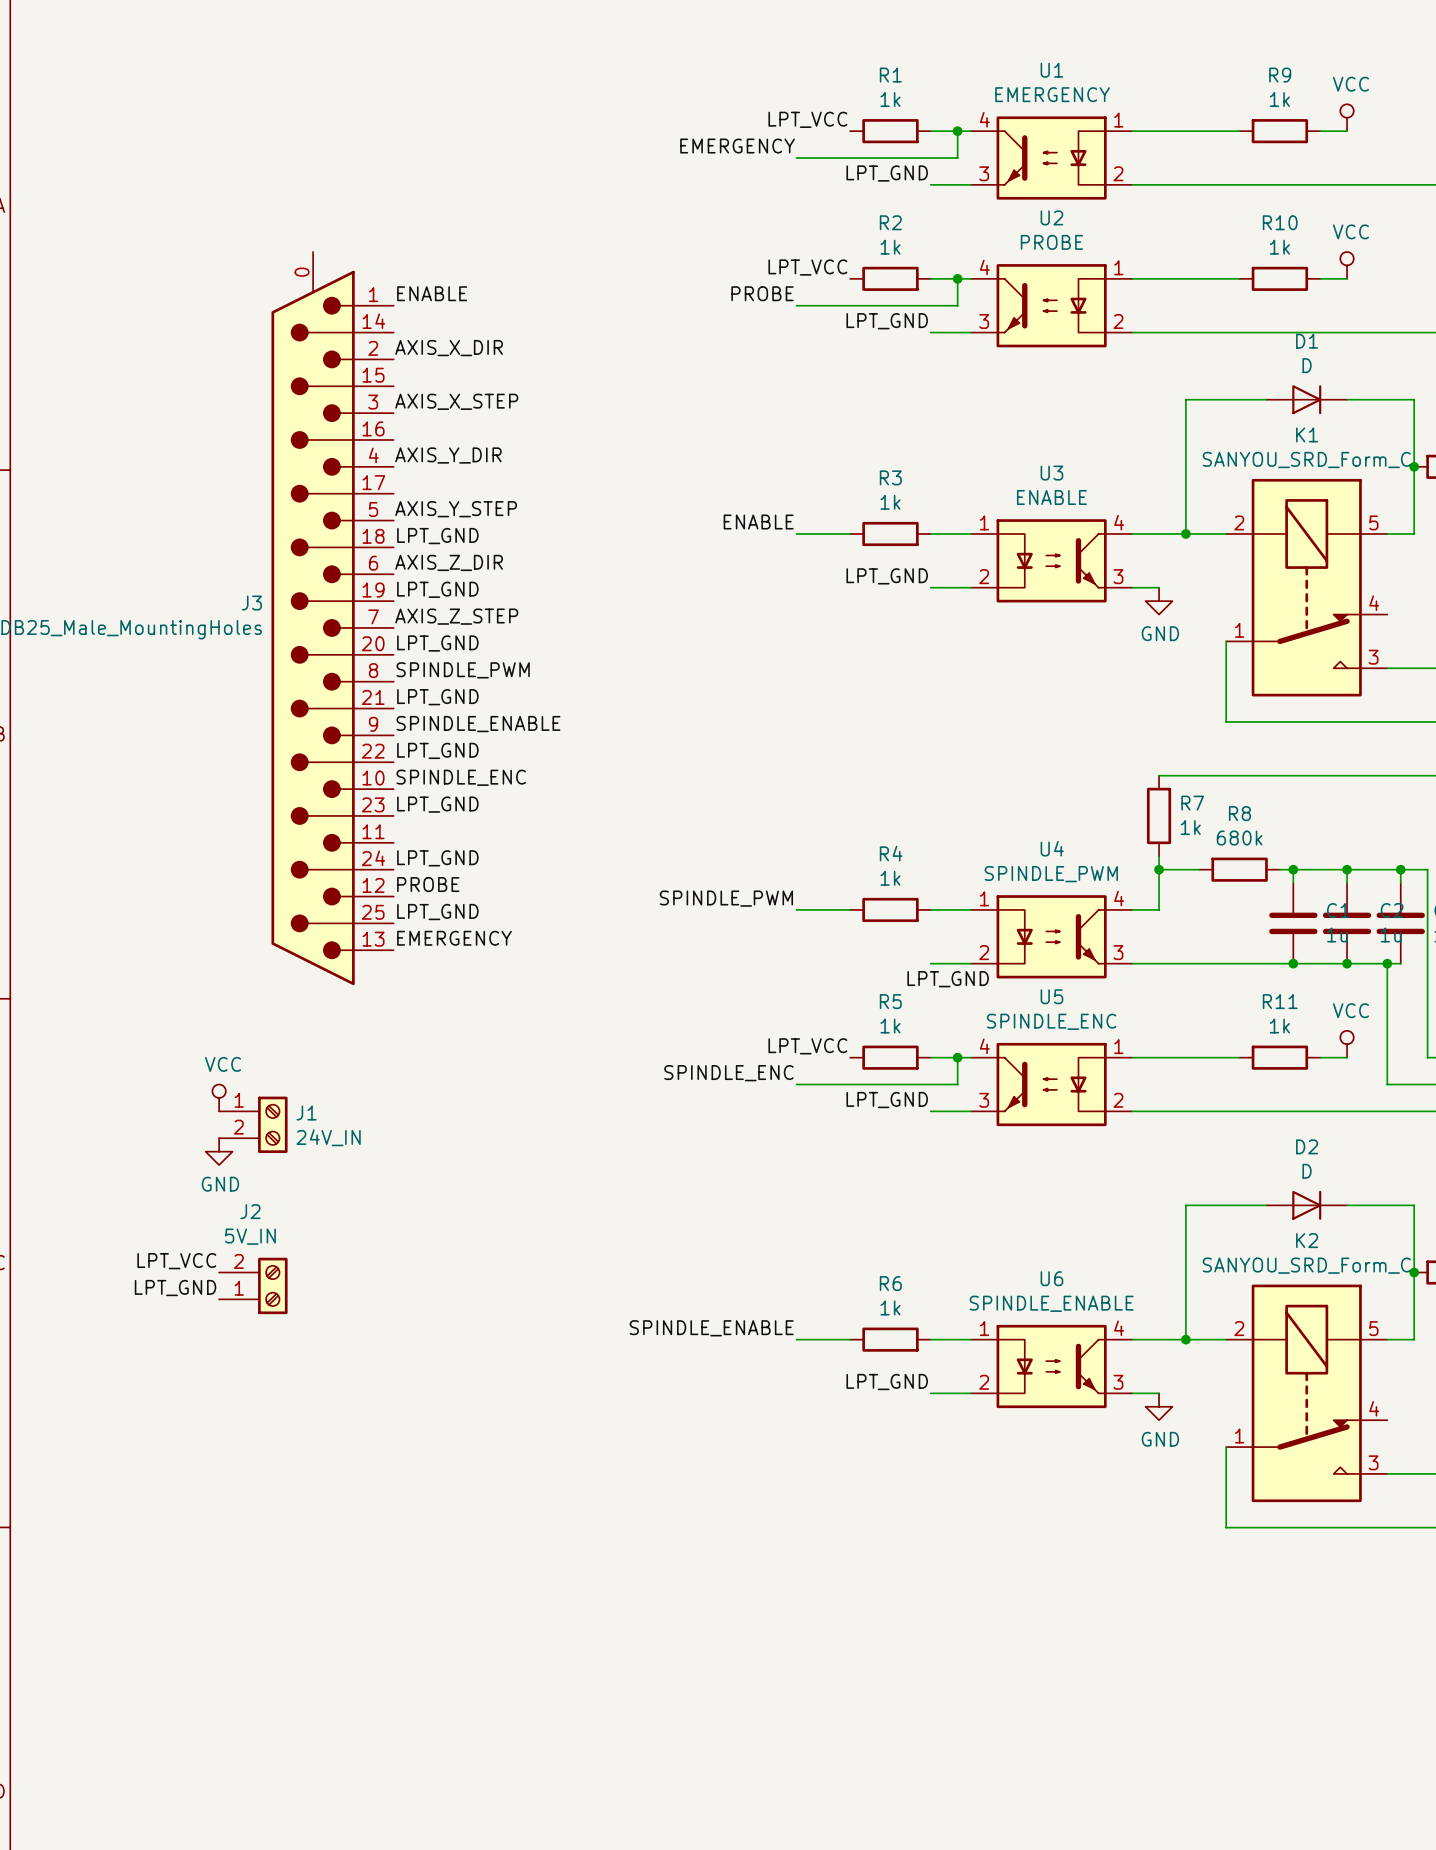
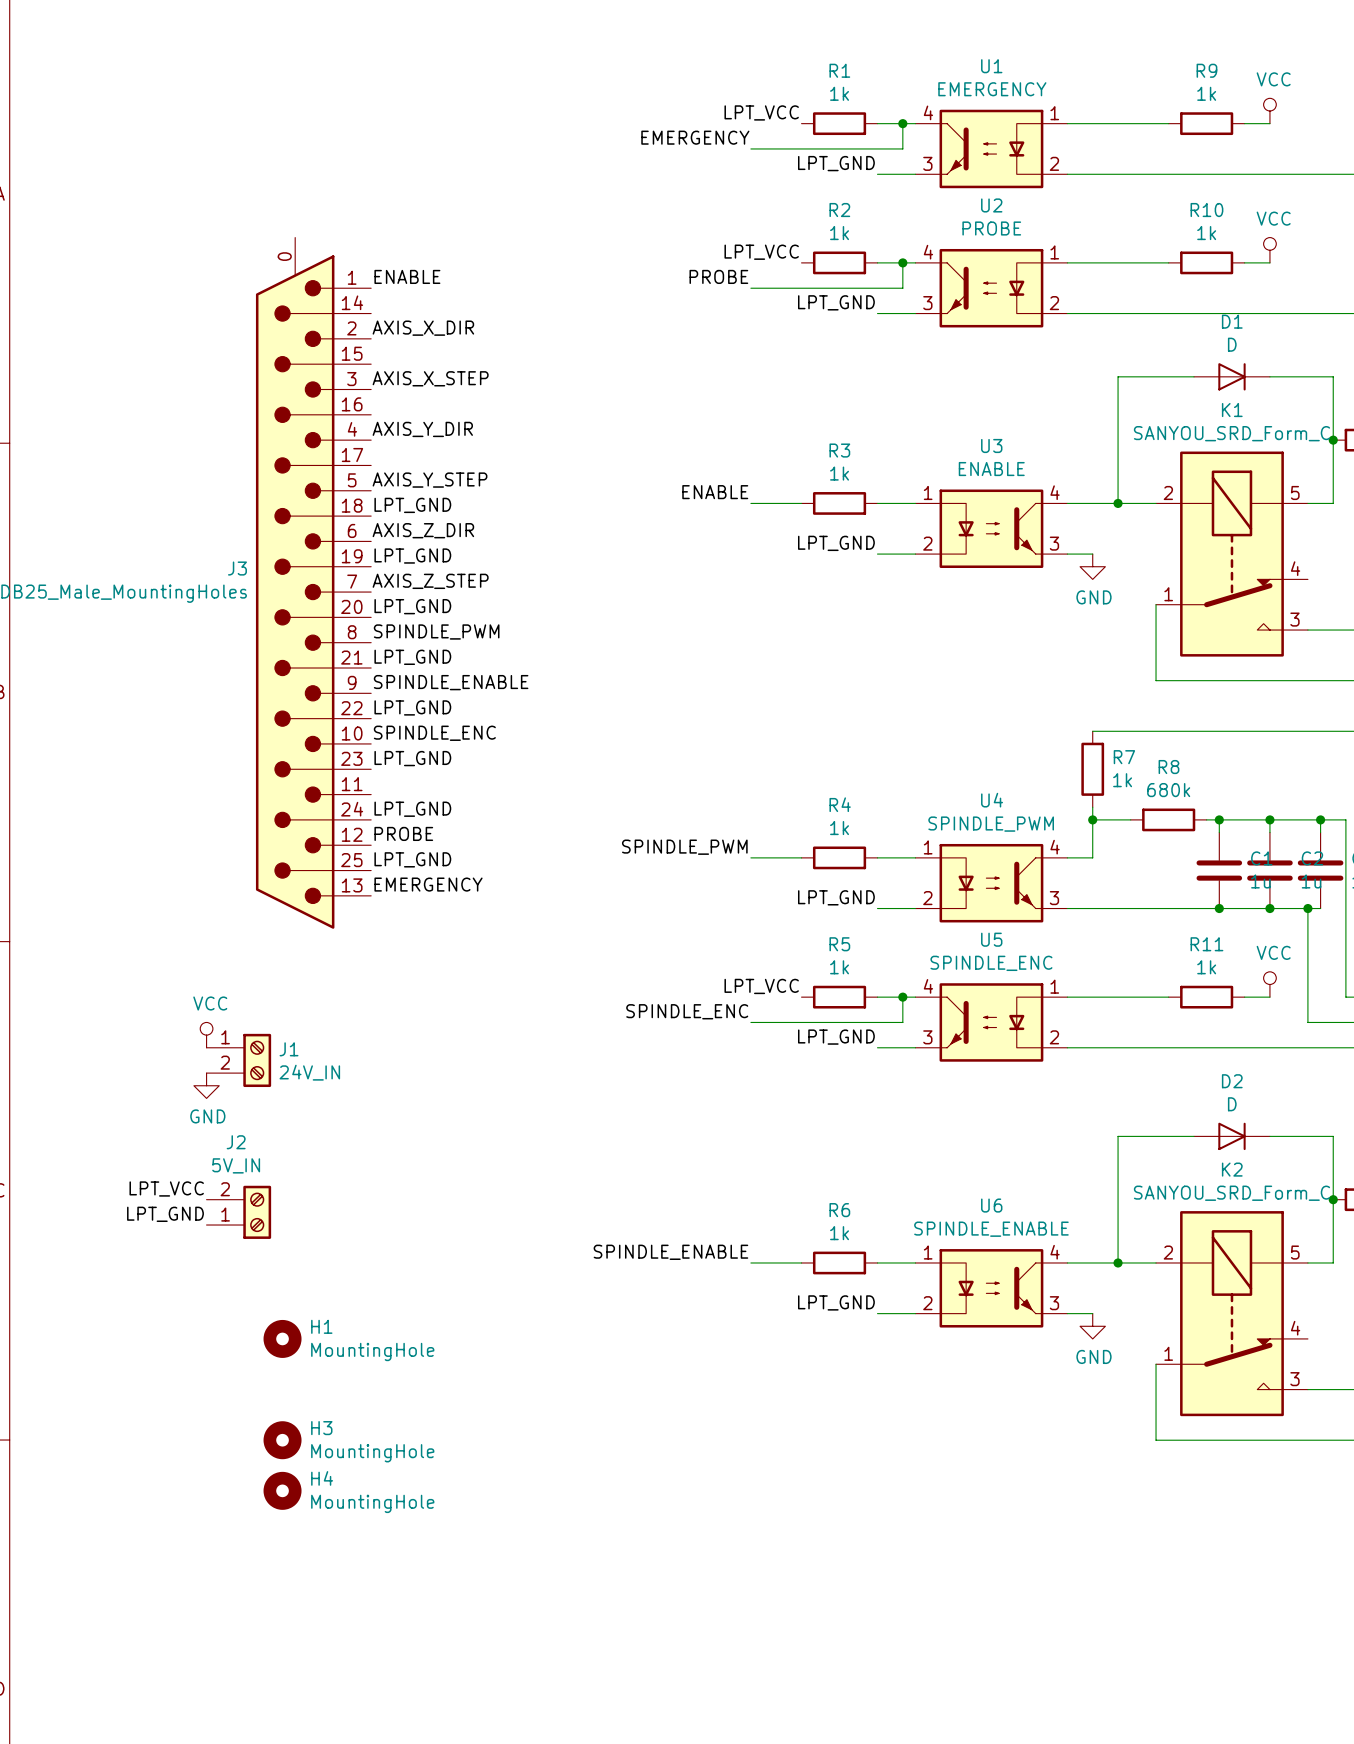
label position: LPT_GND (948, 979) -> LPT_GND (836, 897)
H1: none -> MountingHole (282, 1338)
H3: none -> MountingHole (282, 1440)
H4: none -> MountingHole (282, 1490)

